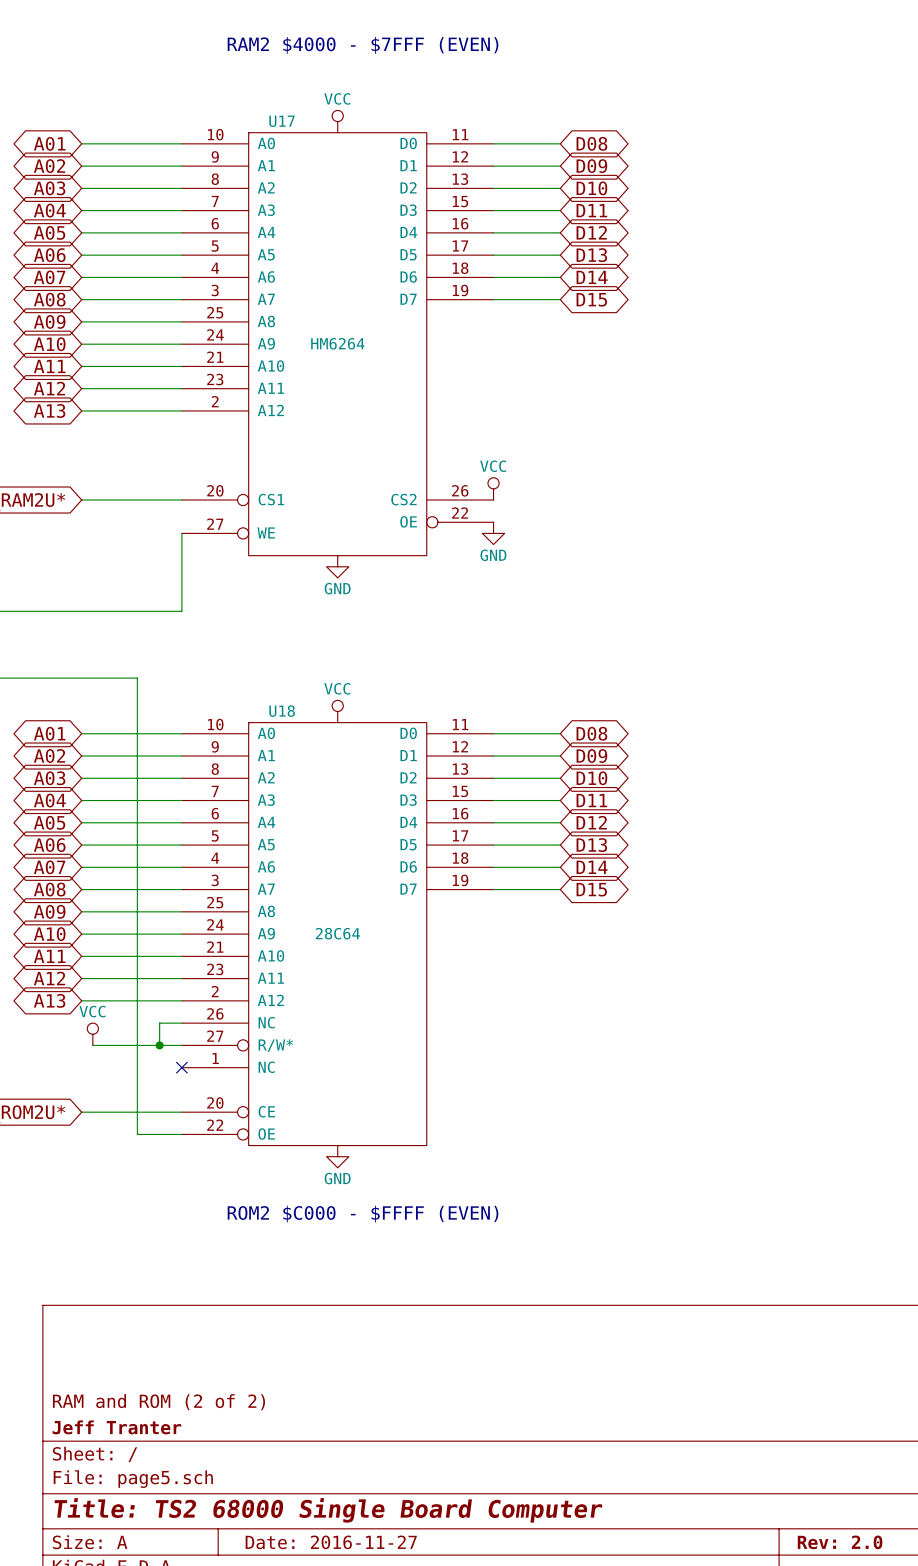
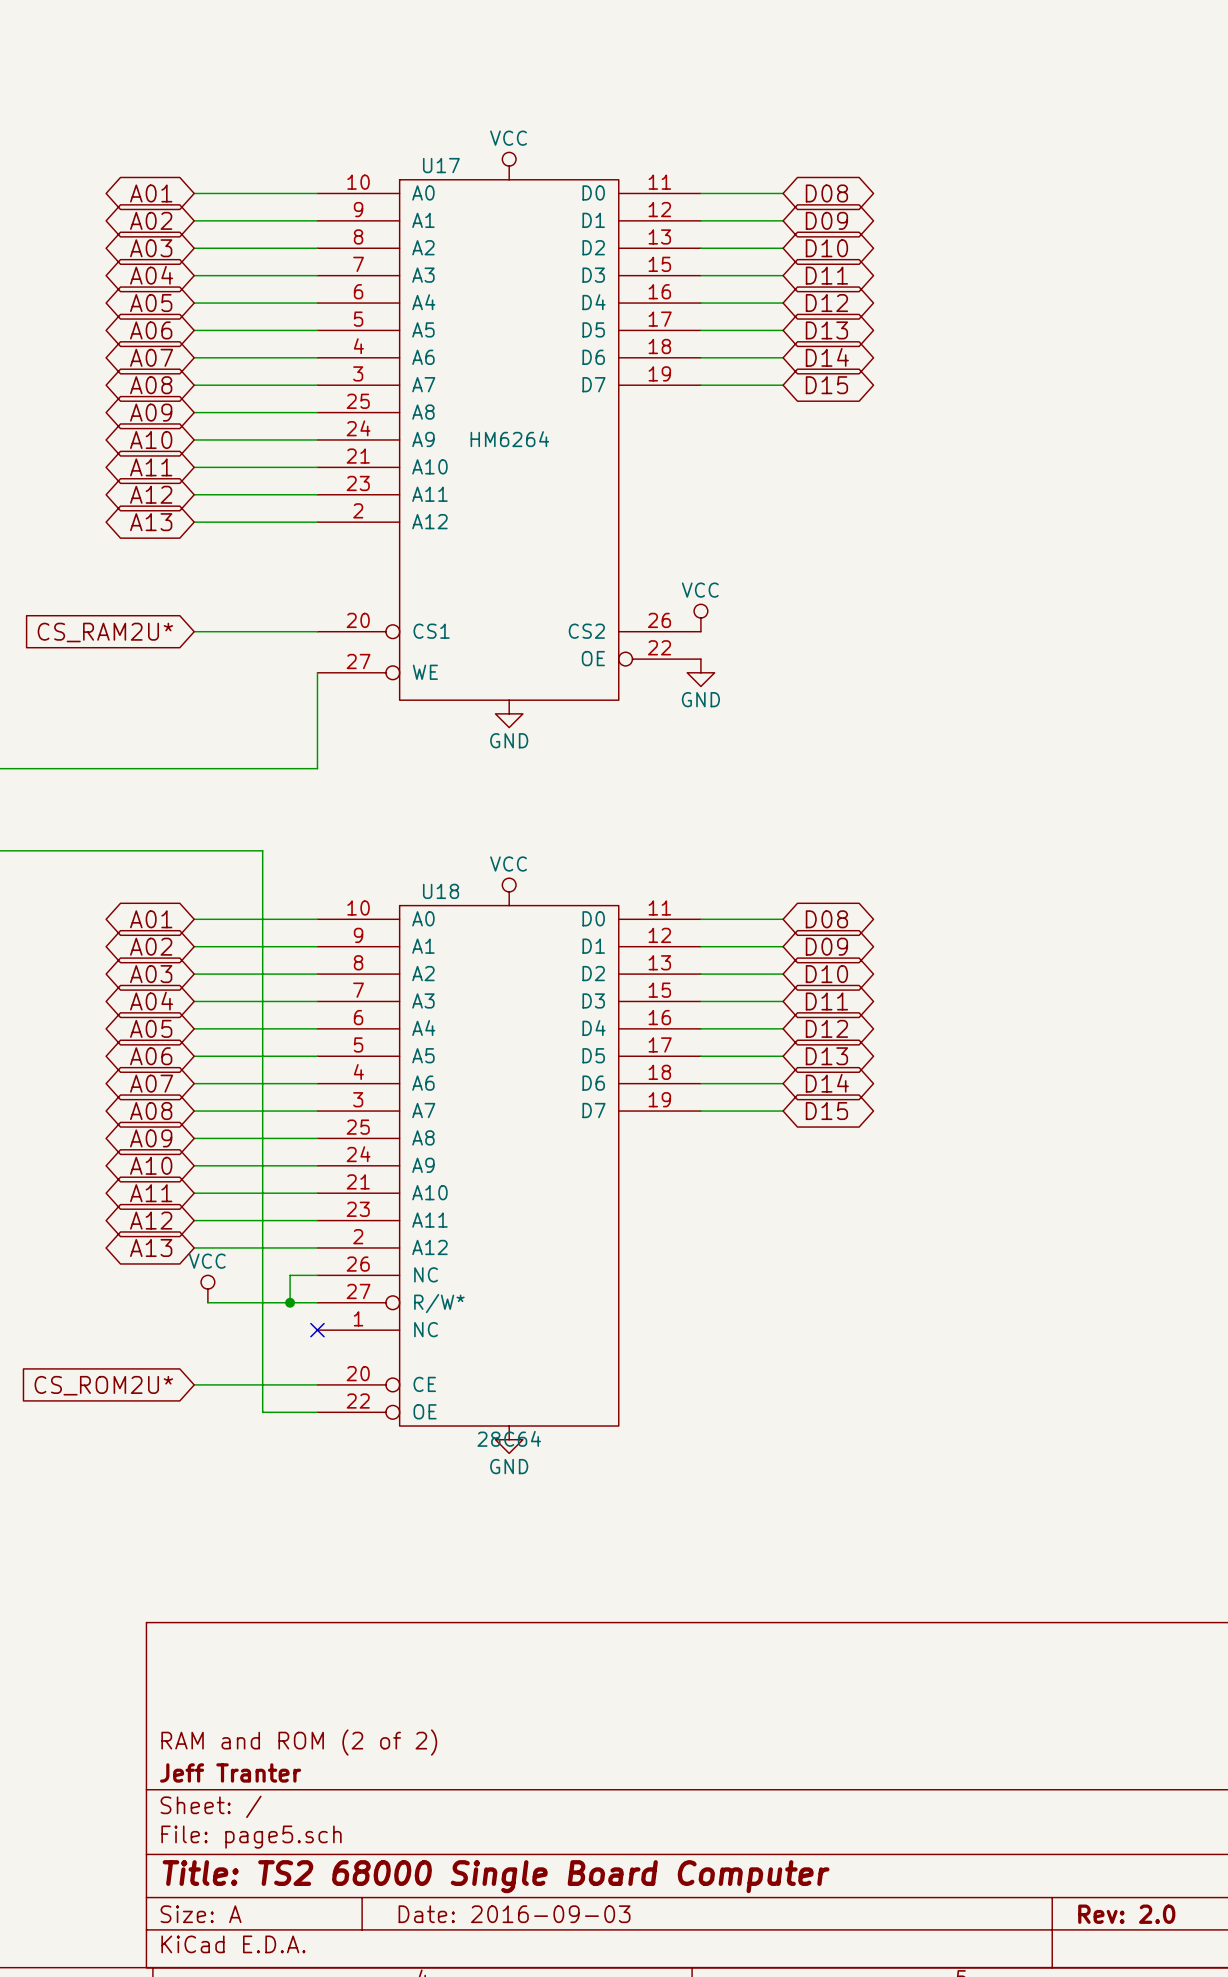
text: RAM2 $4000 - $7FFF (EVEN) (363, 45) -> none
U18 value position: 28C64 (337, 933) -> 28C64 (509, 1438)
text: ROM2 $C000 - $FFFF (EVEN) (363, 1214) -> none
title block: Date: 2016-11-27 (331, 1542) -> Date: 2016-09-03 (514, 1914)

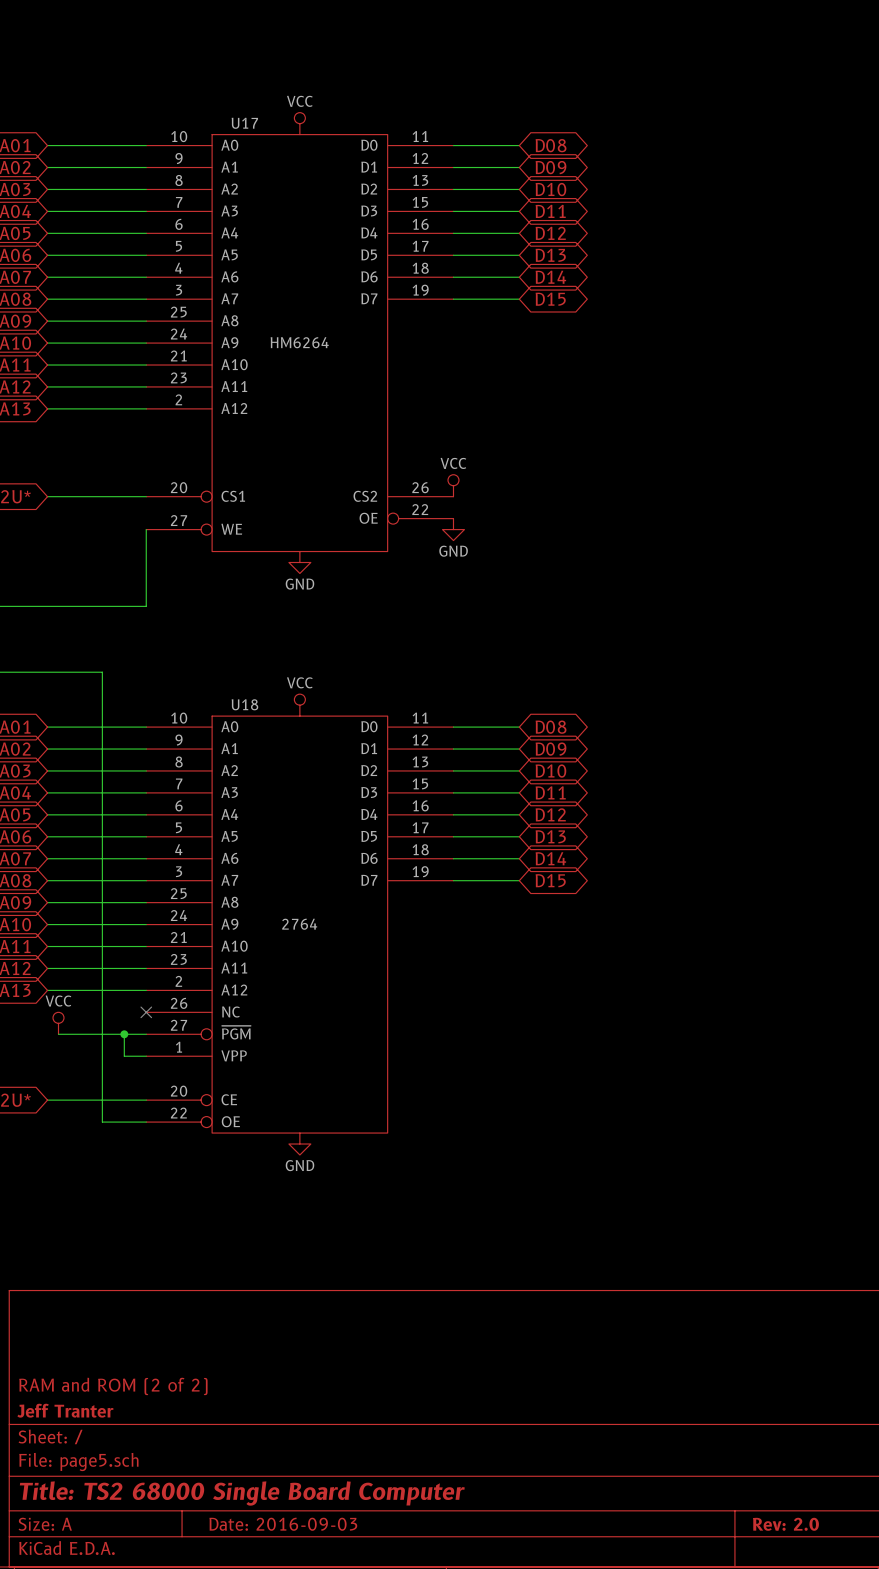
wire: (317, 1275) (290, 1275) (290, 1302) -> (146, 1056) (124, 1056) (124, 1034)
U18 pin name: R/W* (439, 1303) -> ~{PGM} (236, 1032)
U18 pin name: NC (426, 1329) -> VPP (234, 1055)
no-connect mark position: (317, 1330) -> (146, 1012)
U18 value: 28C64 (509, 1438) -> 2764 (299, 924)

